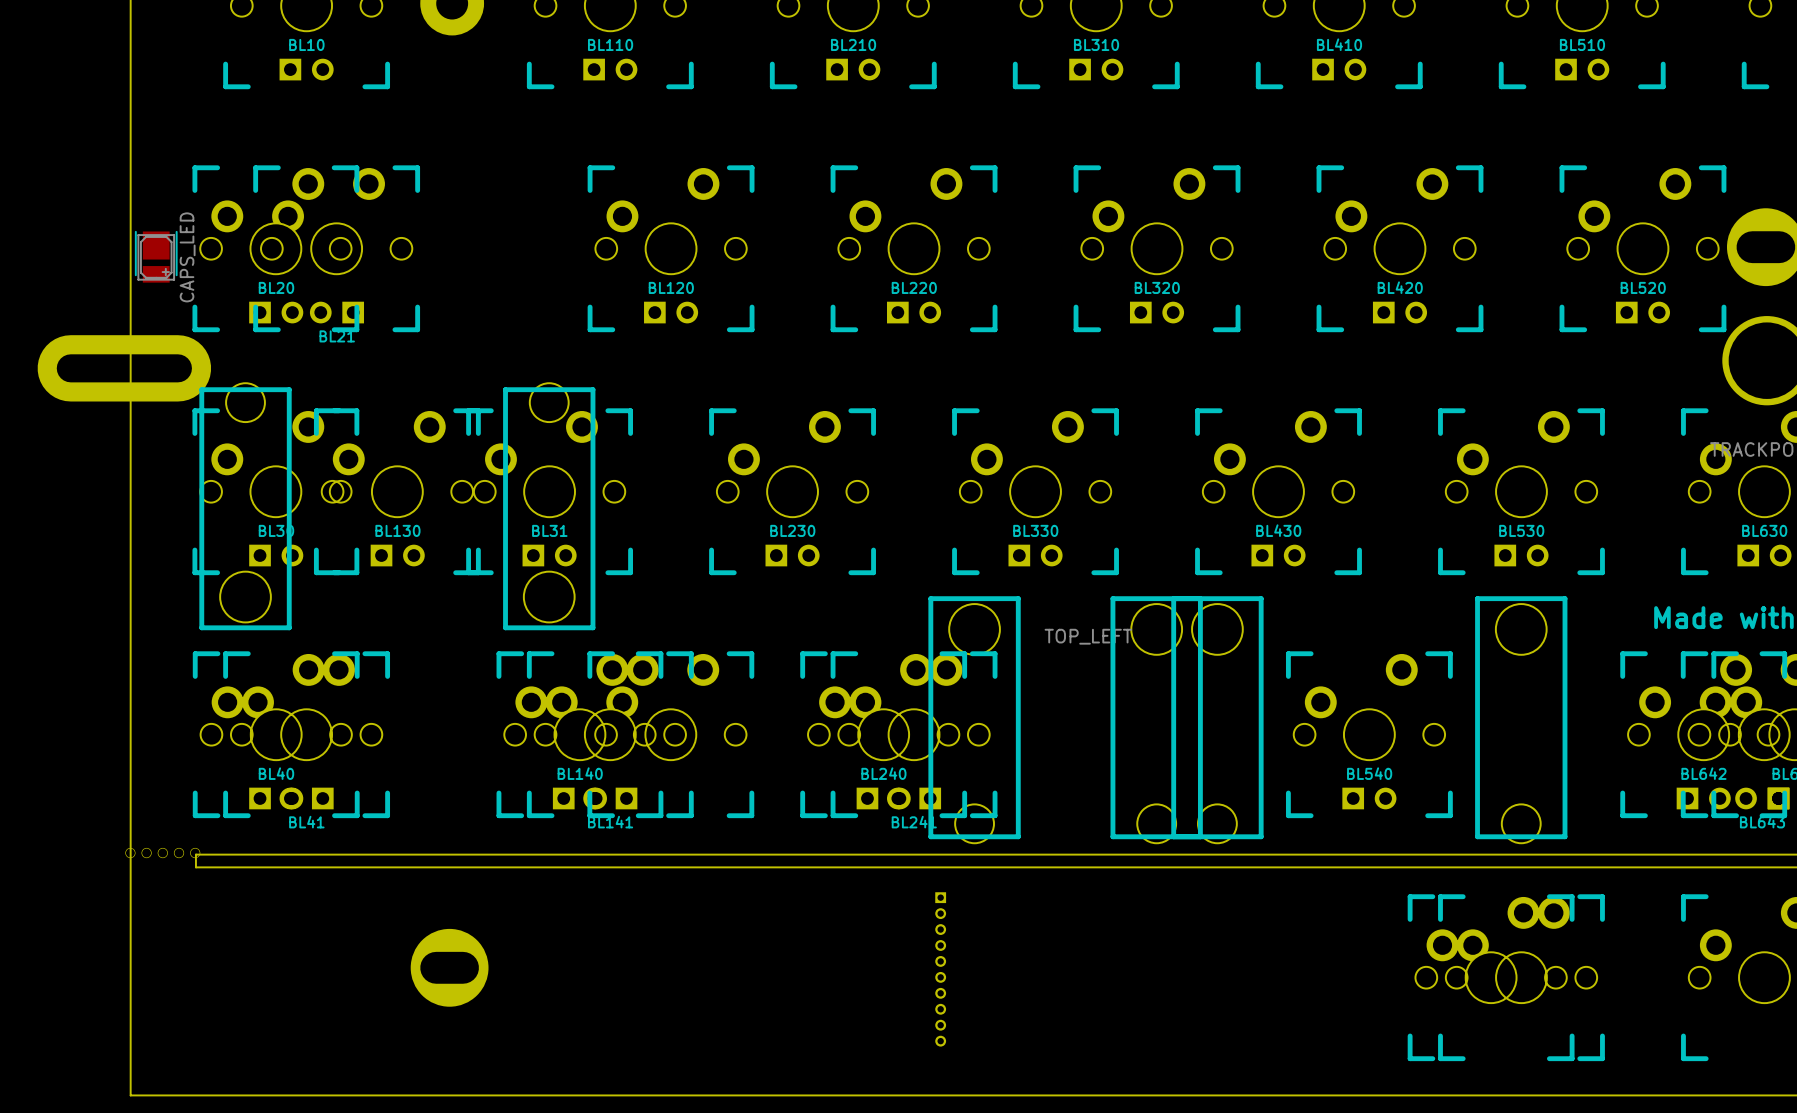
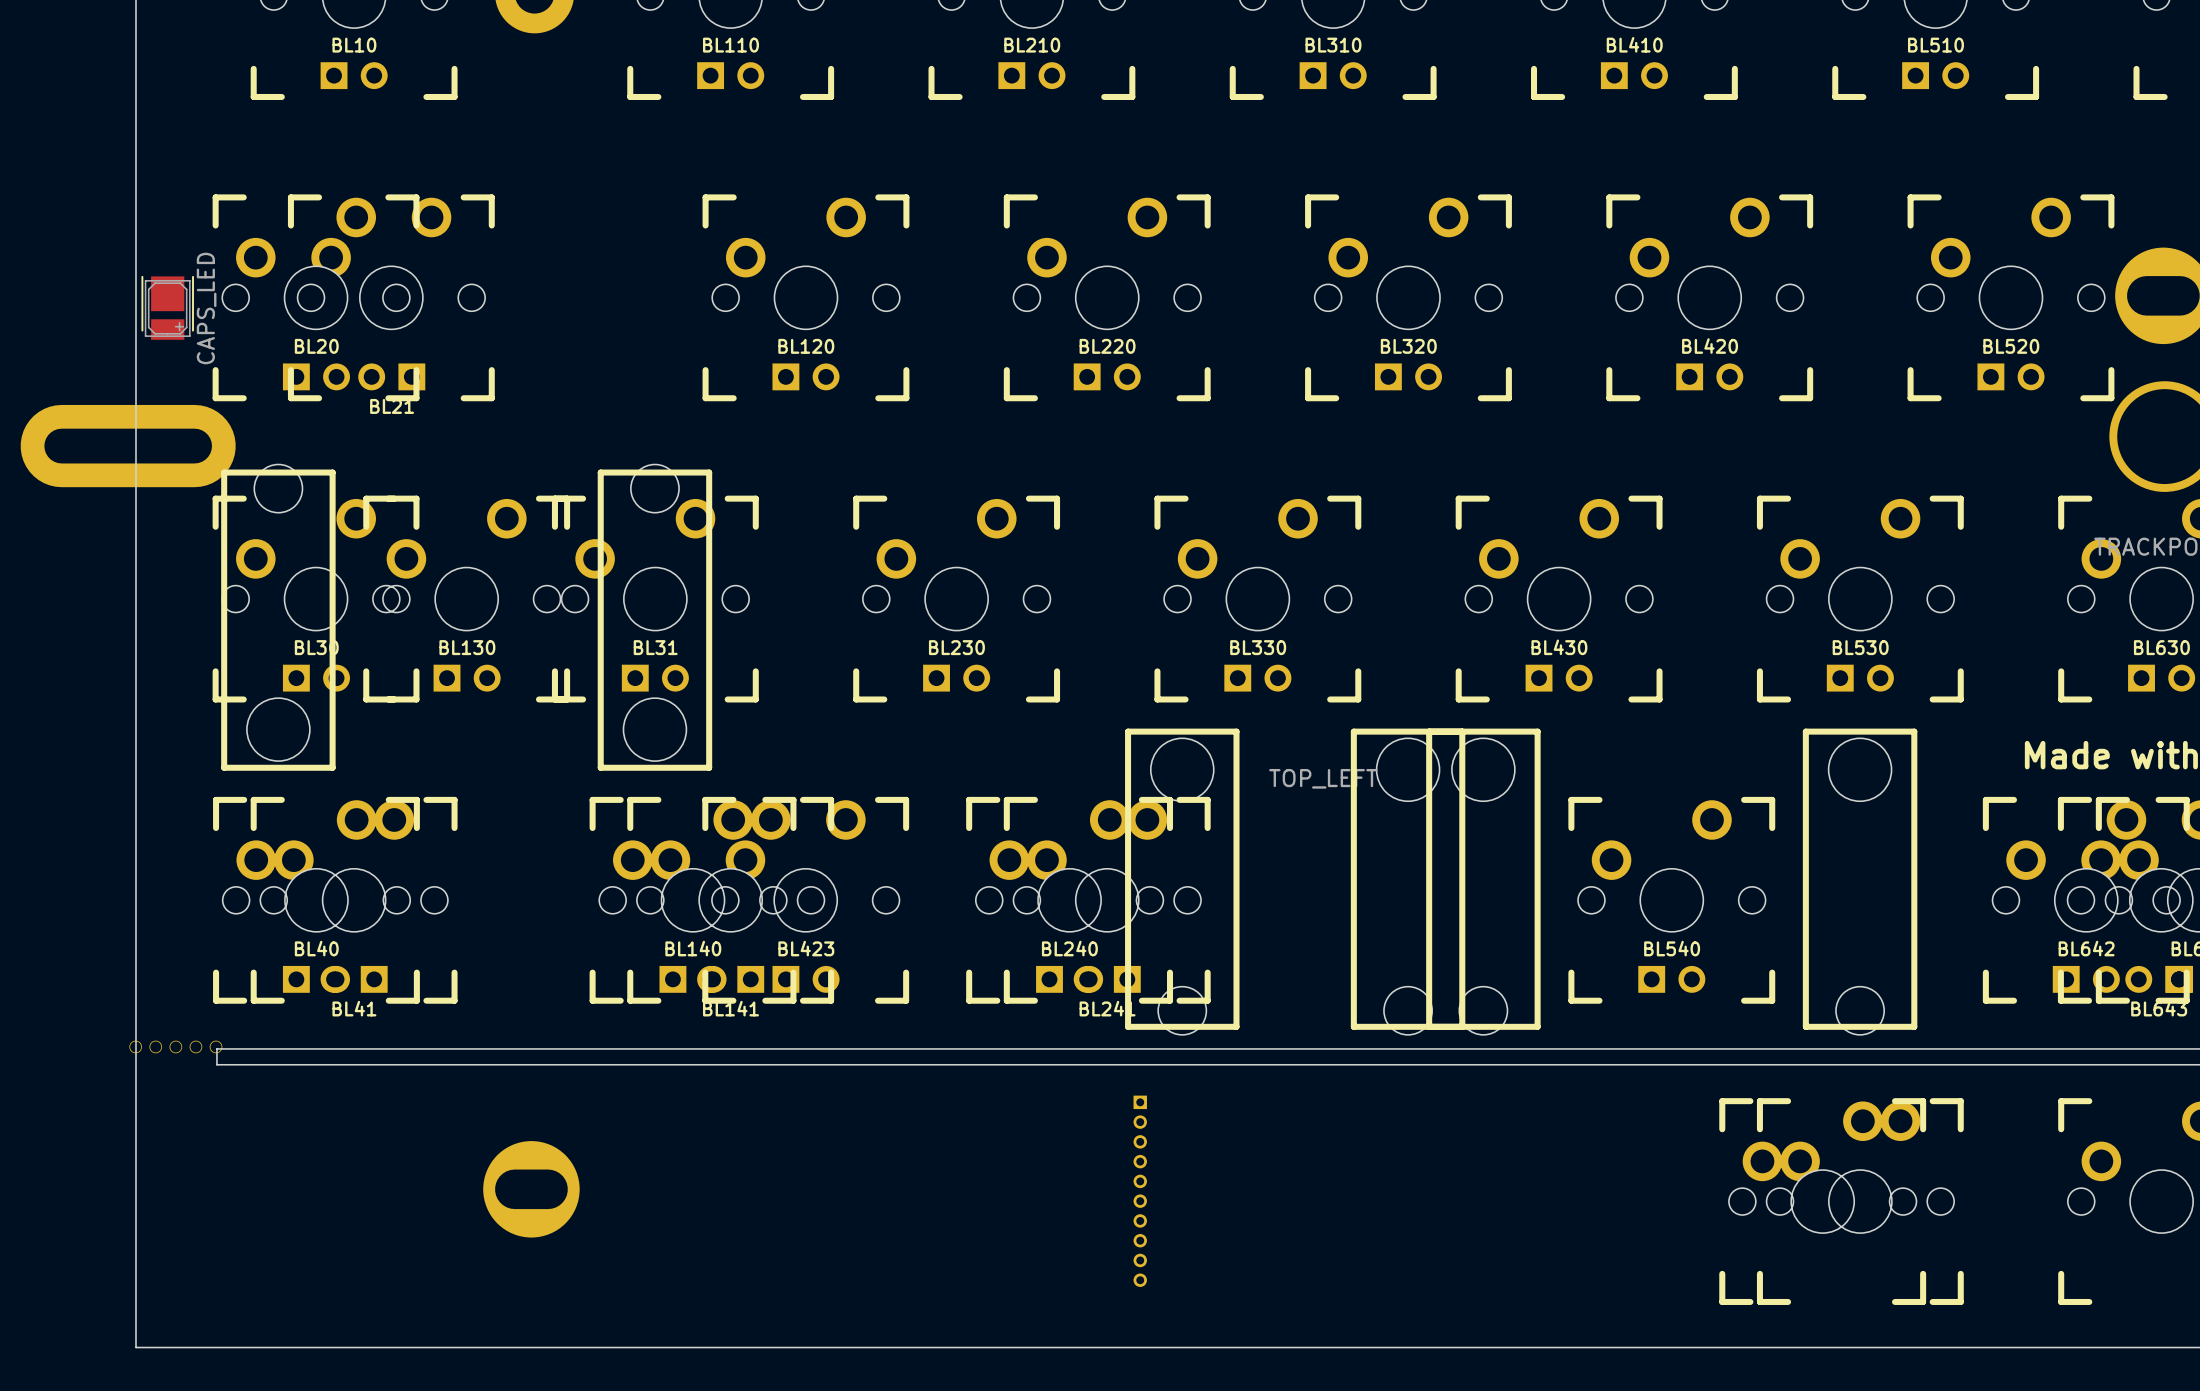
BL423: none -> (806, 979)

